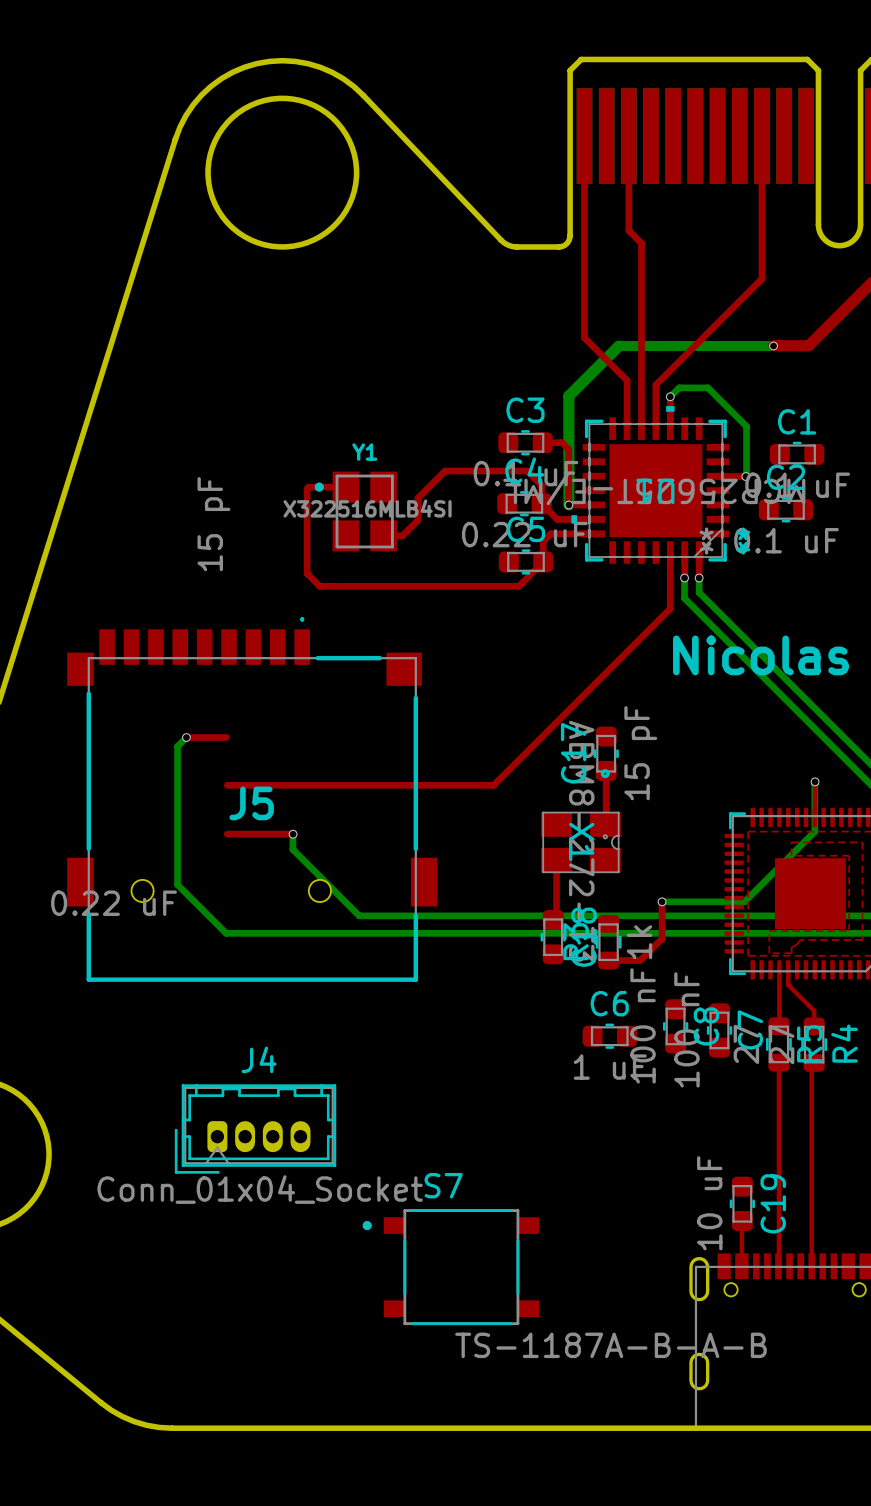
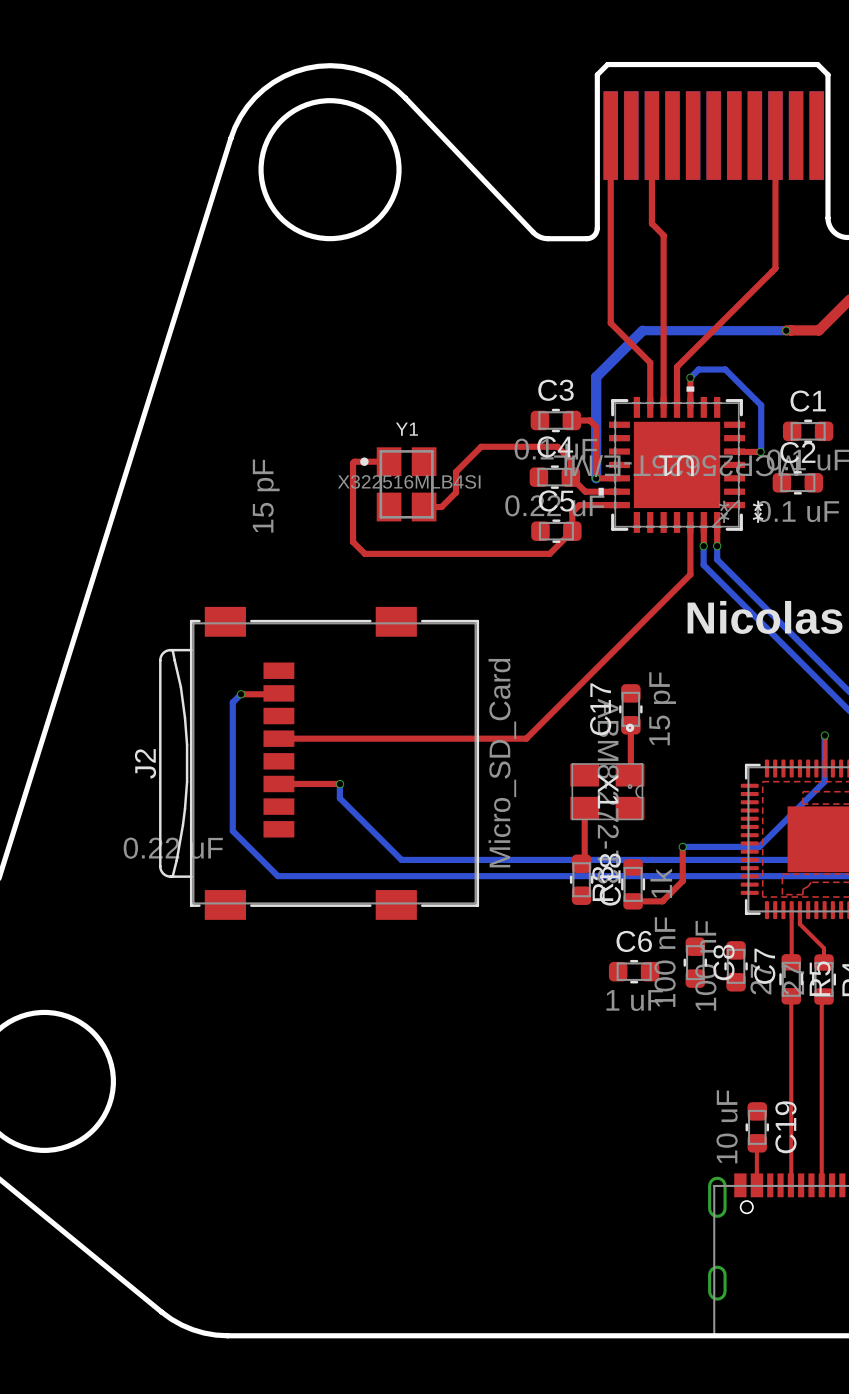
J5: (252, 799) -> none
J2: none -> Micro_SD_Card (319, 763)
J4: Conn_01x04_Socket (255, 1128) -> none
S7: TS-1187A-B-A-B (450, 1267) -> none

